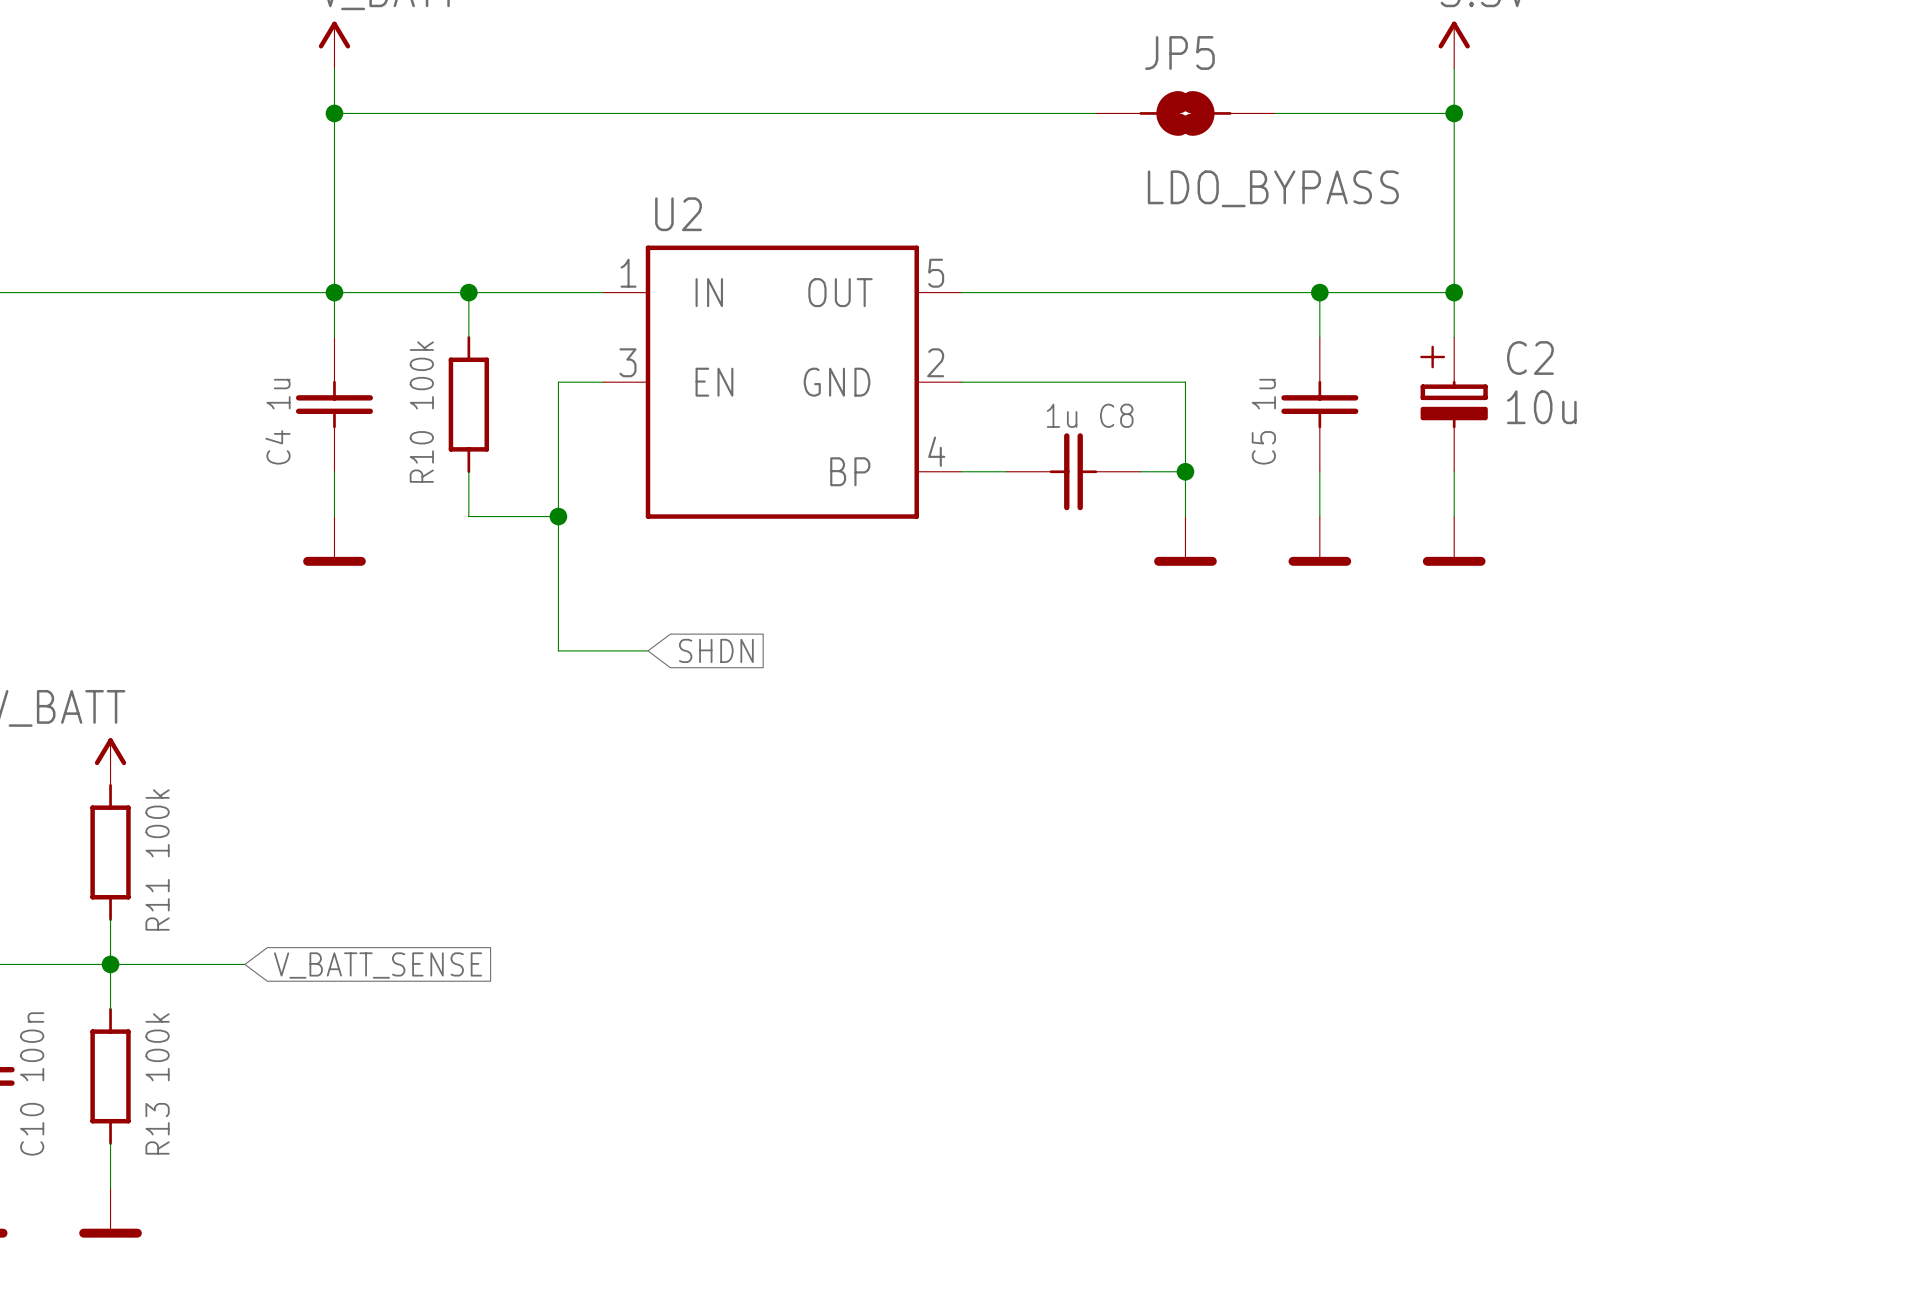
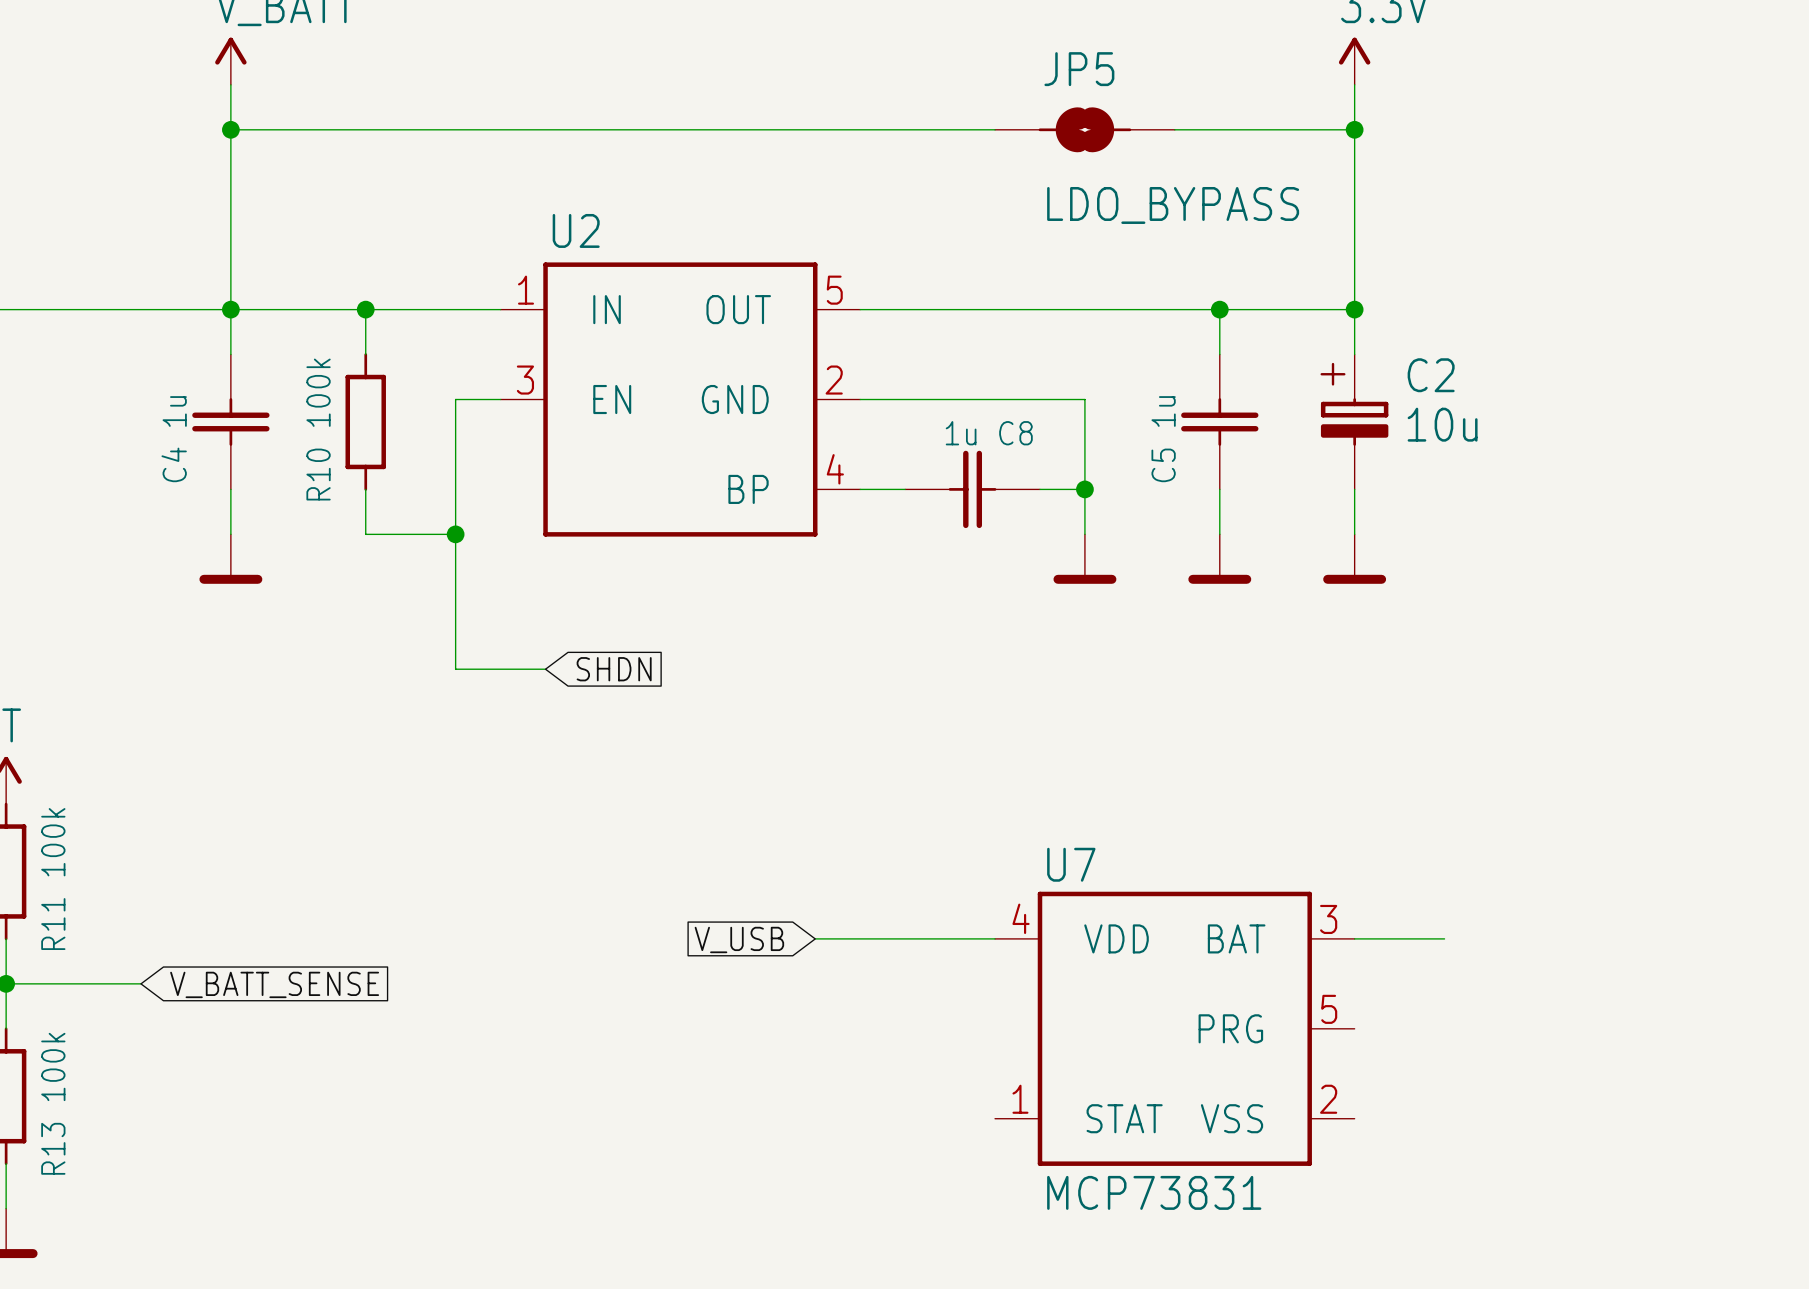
wire: none -> (815, 938) (995, 938)
wire: none -> (1354, 938) (1444, 938)
global label: none -> V_USB (739, 939)
U7: none -> MCP73831 (1174, 1028)

